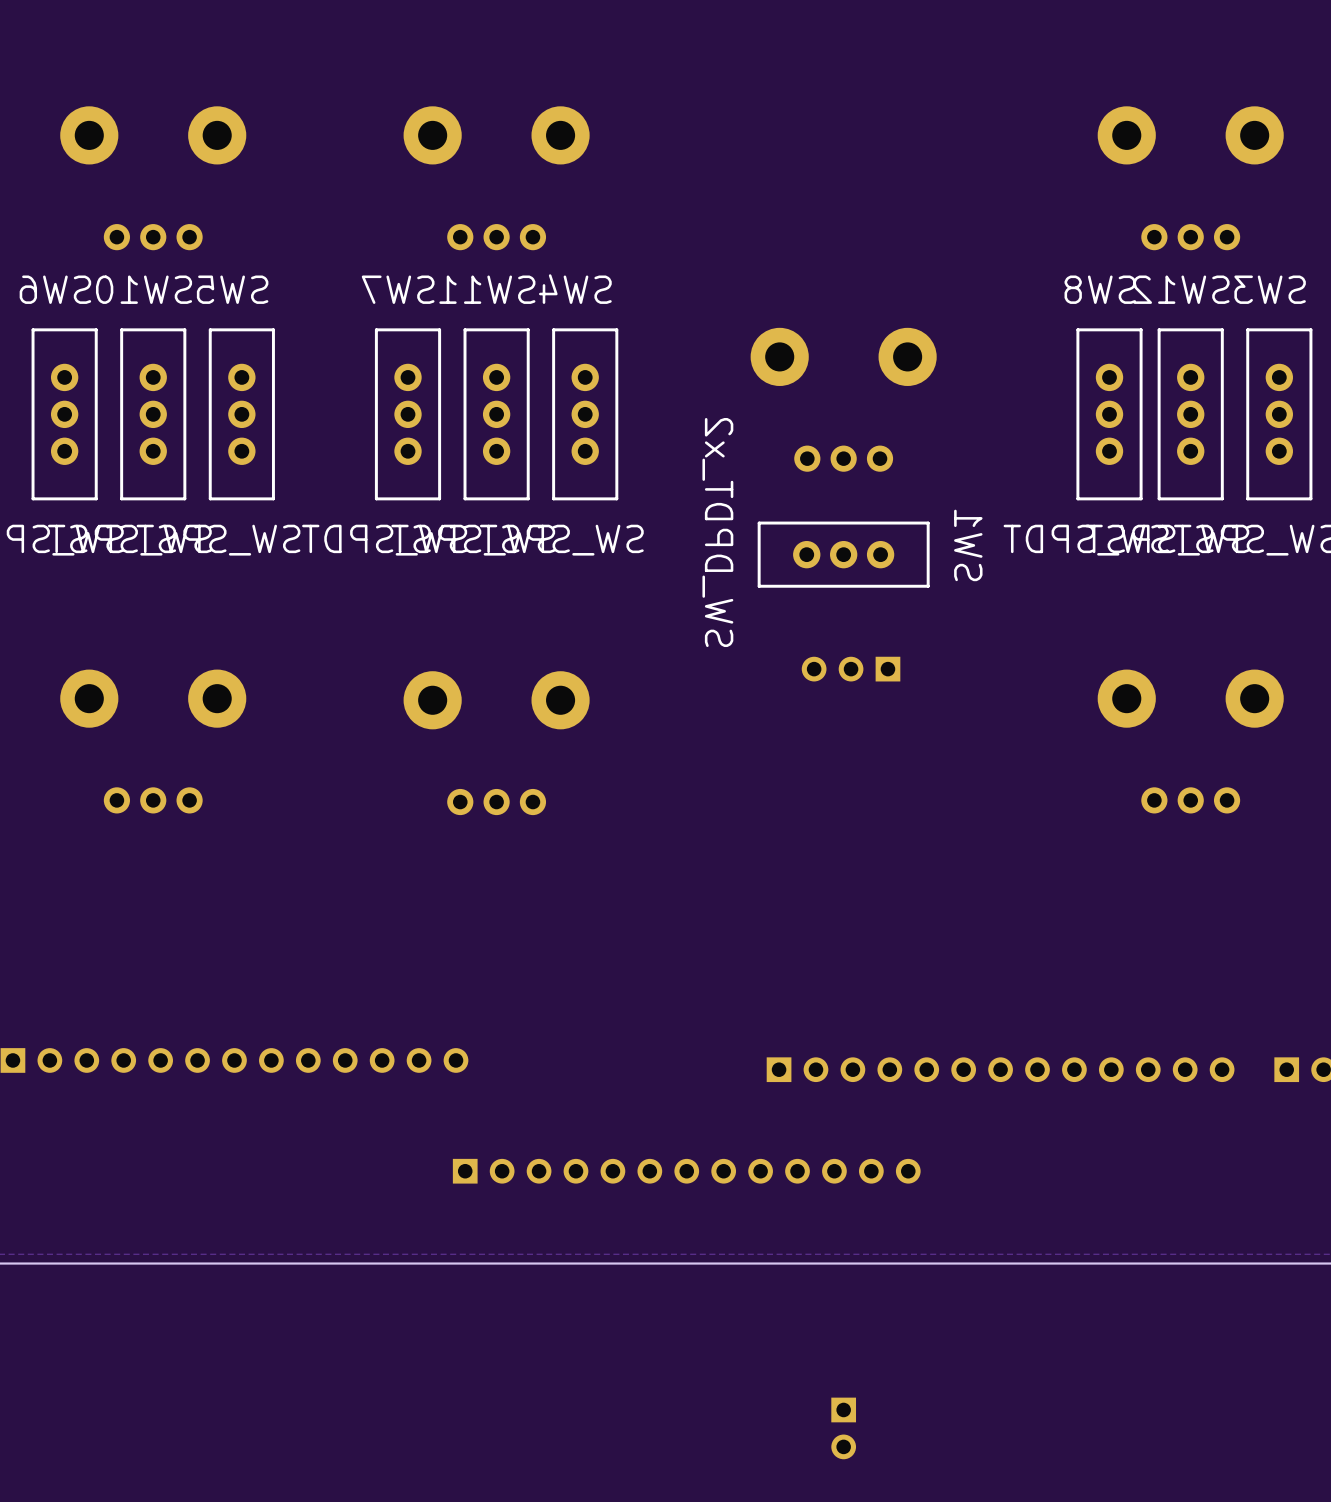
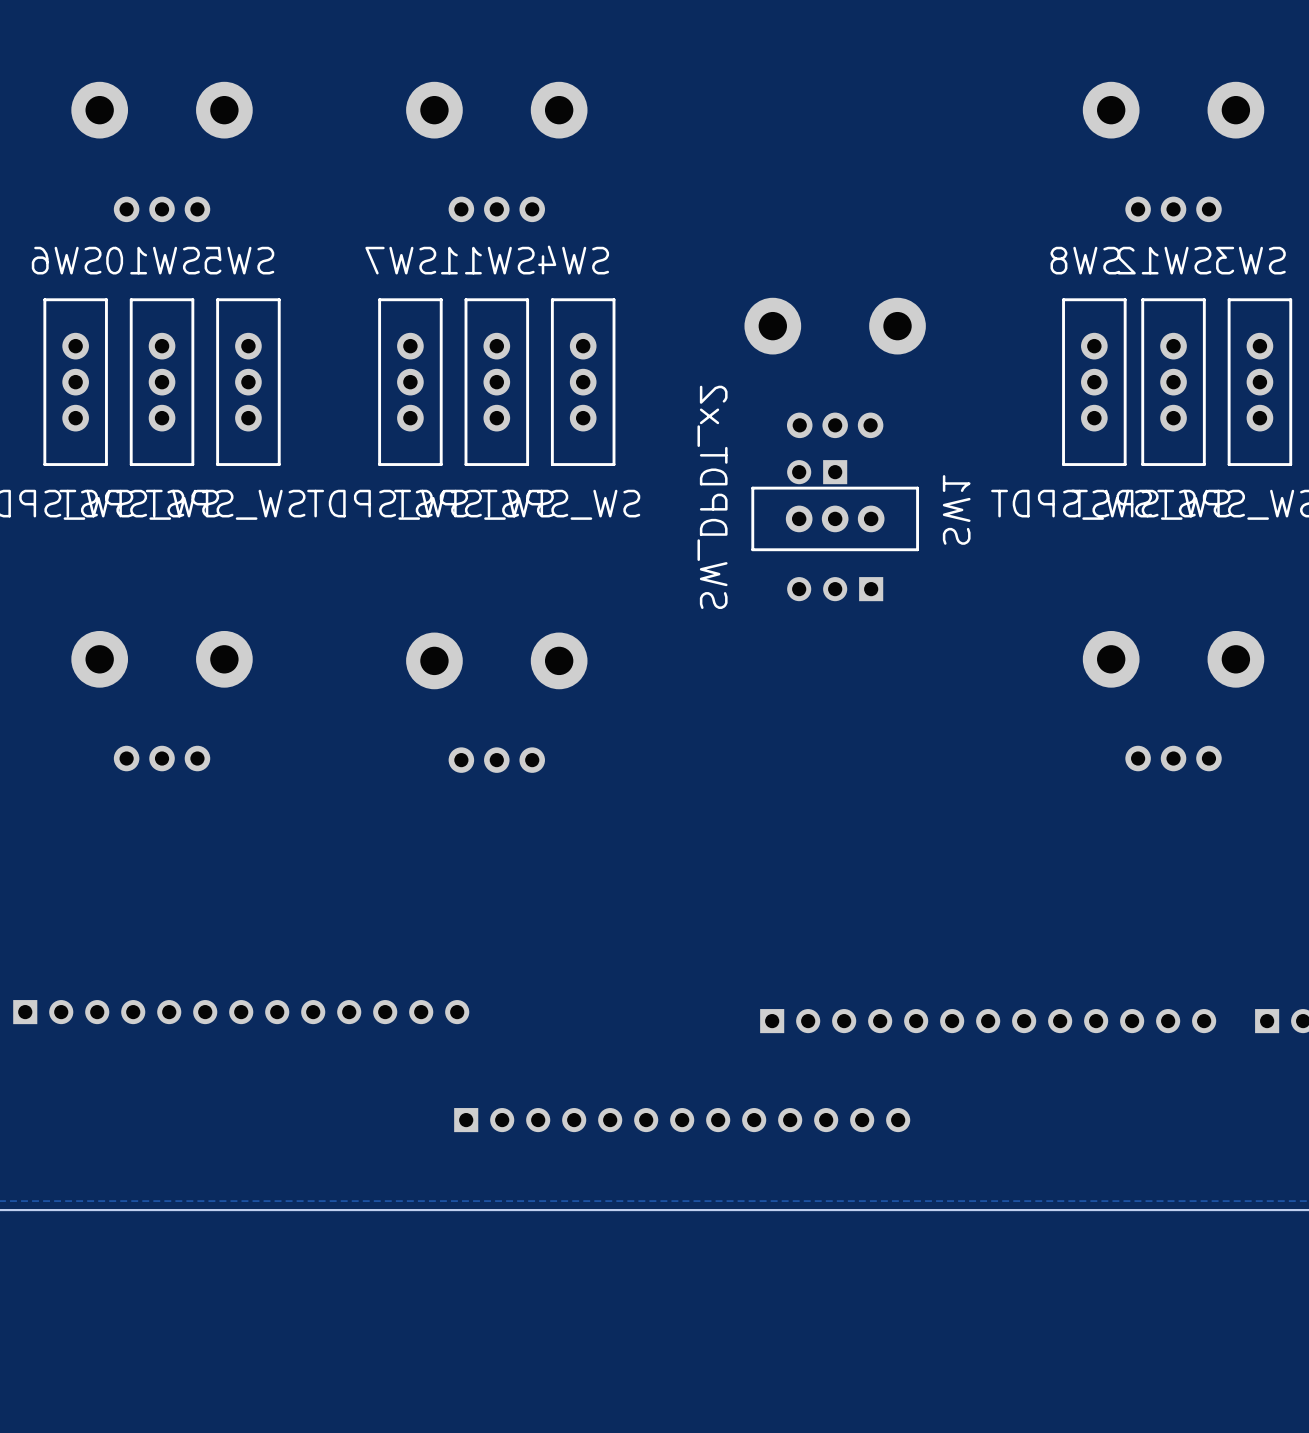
part: none -> (817, 472)
part position: (851, 669) -> (835, 589)
part: (843, 1428) -> none

